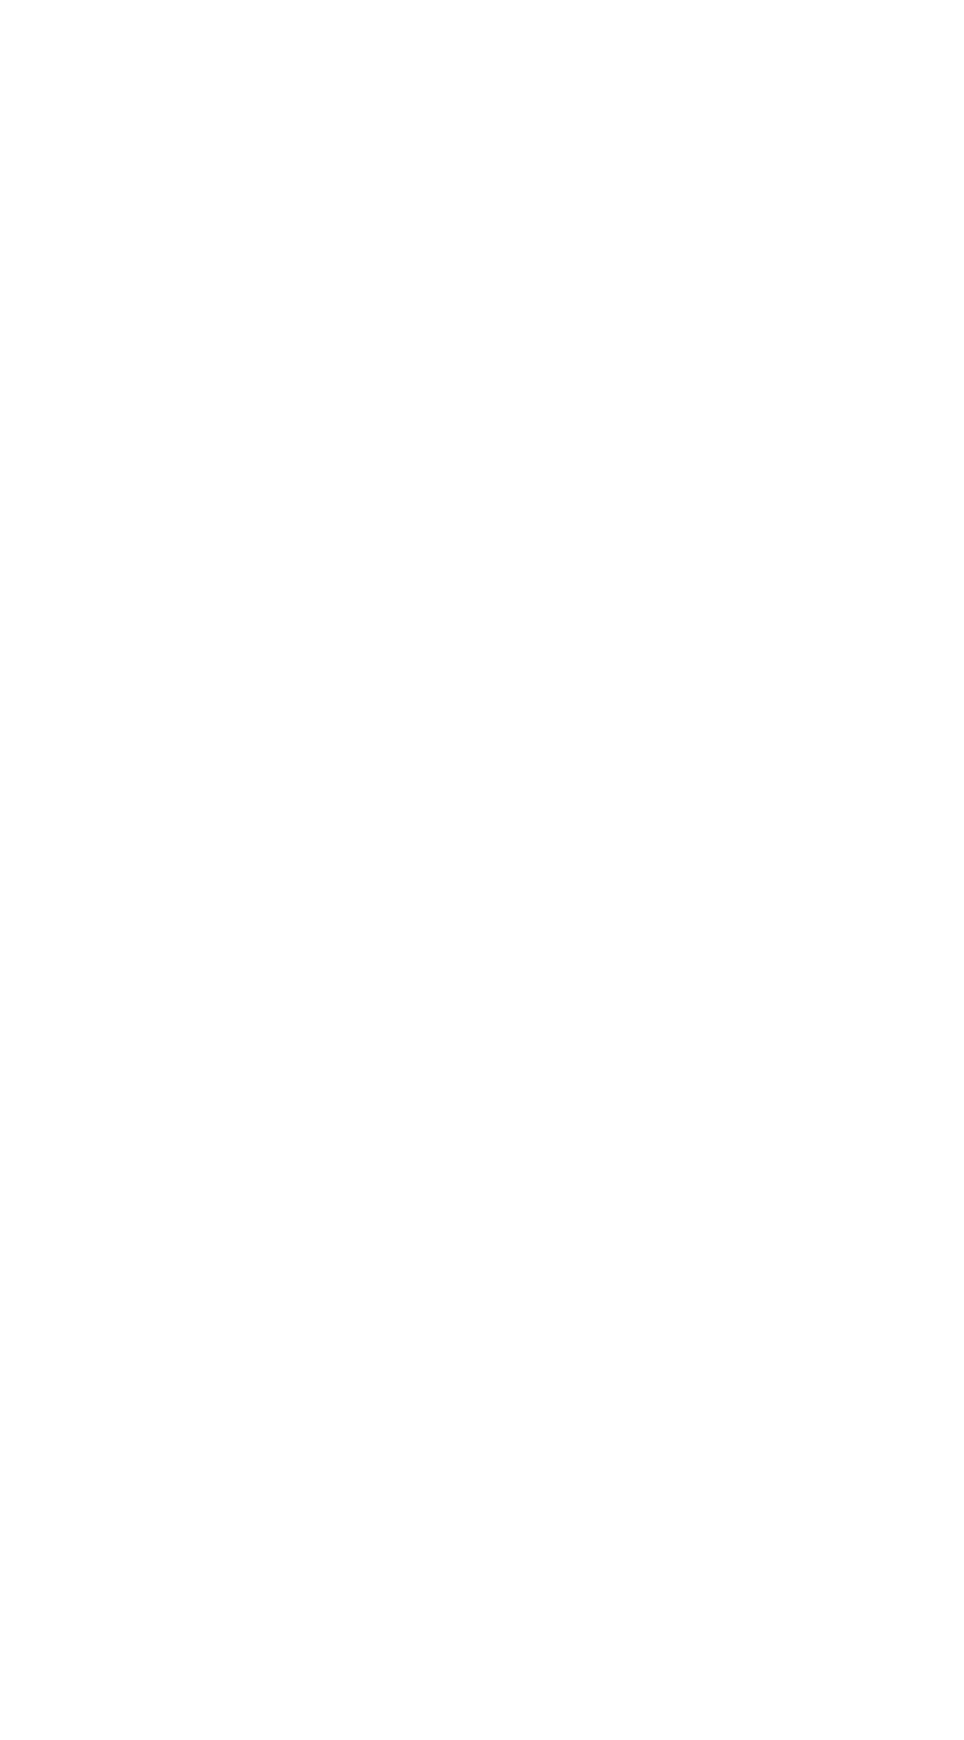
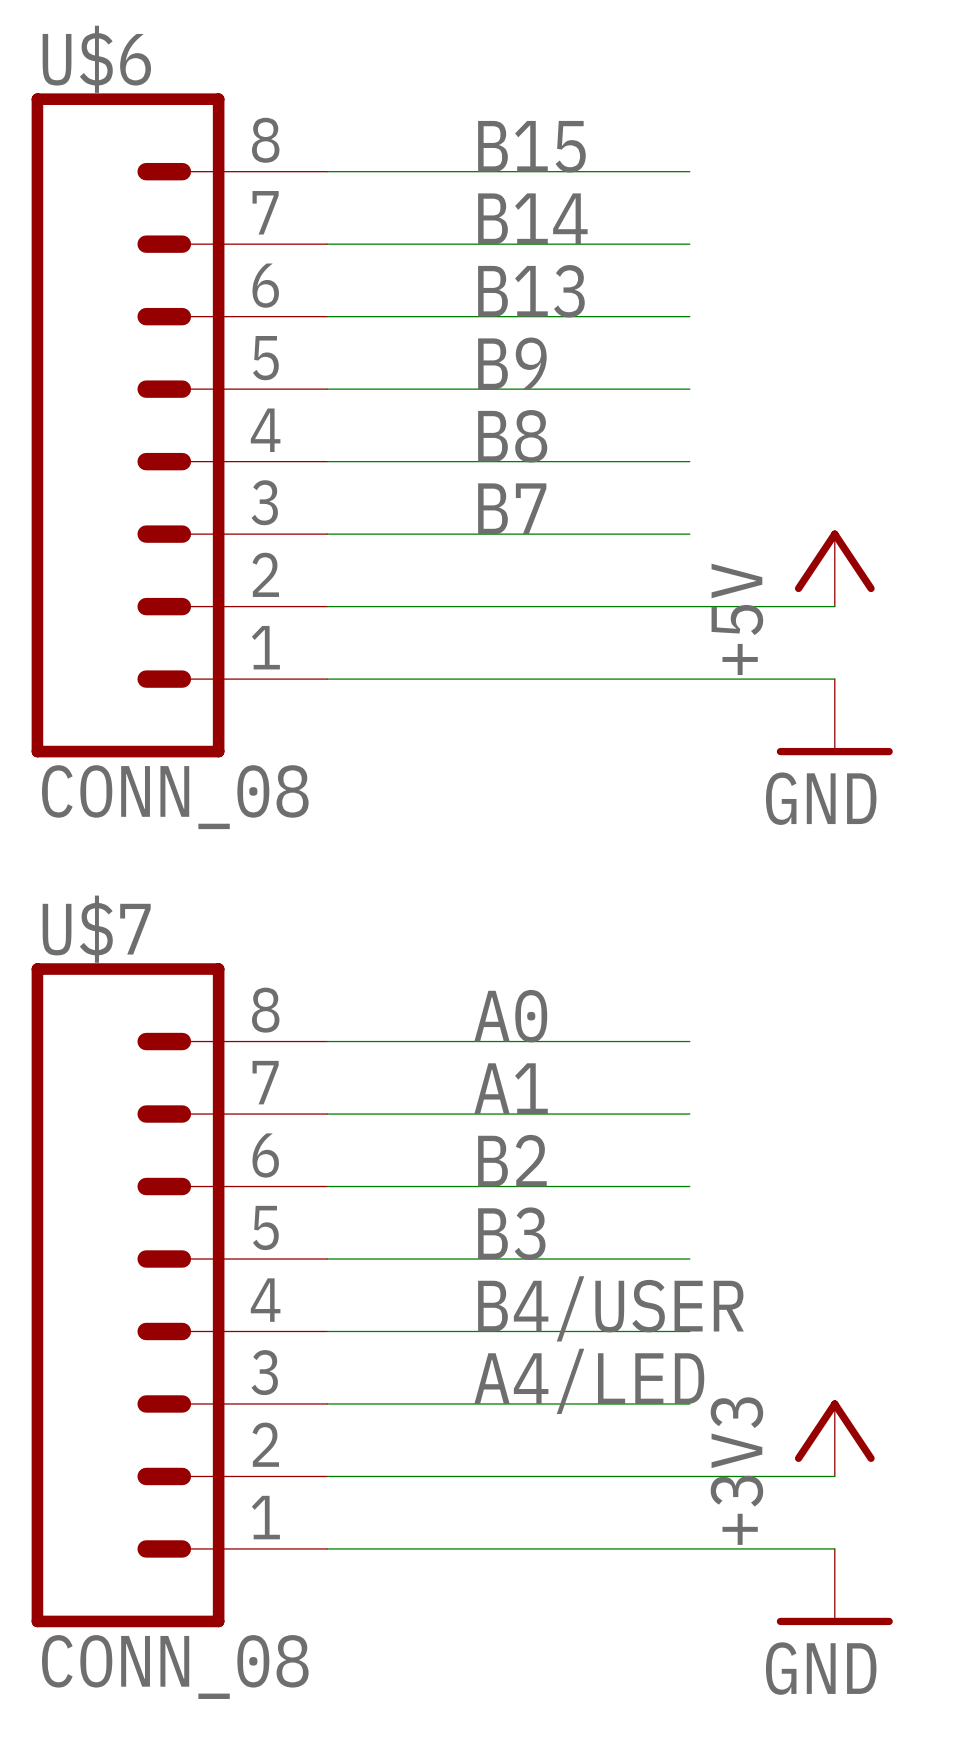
label: none -> B15 (531, 146)
wire: none -> (327, 171) (689, 171)
label: none -> B14 (532, 218)
wire: none -> (327, 244) (689, 244)
label: none -> B13 (531, 291)
wire: none -> (327, 316) (689, 316)
label: none -> B9 (512, 363)
wire: none -> (327, 389) (689, 389)
U$6: none -> CONN_08 (179, 425)
label: none -> B8 (512, 436)
wire: none -> (327, 461) (689, 461)
label: none -> B7 (512, 508)
wire: none -> (327, 534) (689, 534)
power symbol: none -> +5V (834, 568)
wire: none -> (327, 606) (834, 606)
wire: none -> (327, 679) (834, 679)
power symbol: none -> GND (834, 717)
label: none -> A0 (510, 1016)
wire: none -> (327, 1041) (689, 1041)
label: none -> A1 (511, 1088)
wire: none -> (327, 1114) (689, 1114)
label: none -> B2 (512, 1160)
wire: none -> (327, 1186) (689, 1186)
label: none -> B3 (511, 1233)
wire: none -> (327, 1259) (689, 1259)
U$7: none -> CONN_08 (179, 1295)
label: none -> B4/USER (610, 1308)
wire: none -> (327, 1331) (689, 1331)
label: none -> A4/LED (589, 1381)
wire: none -> (327, 1403) (689, 1403)
power symbol: none -> +3V3 (834, 1438)
wire: none -> (327, 1476) (834, 1476)
wire: none -> (327, 1548) (834, 1548)
power symbol: none -> GND (834, 1587)

